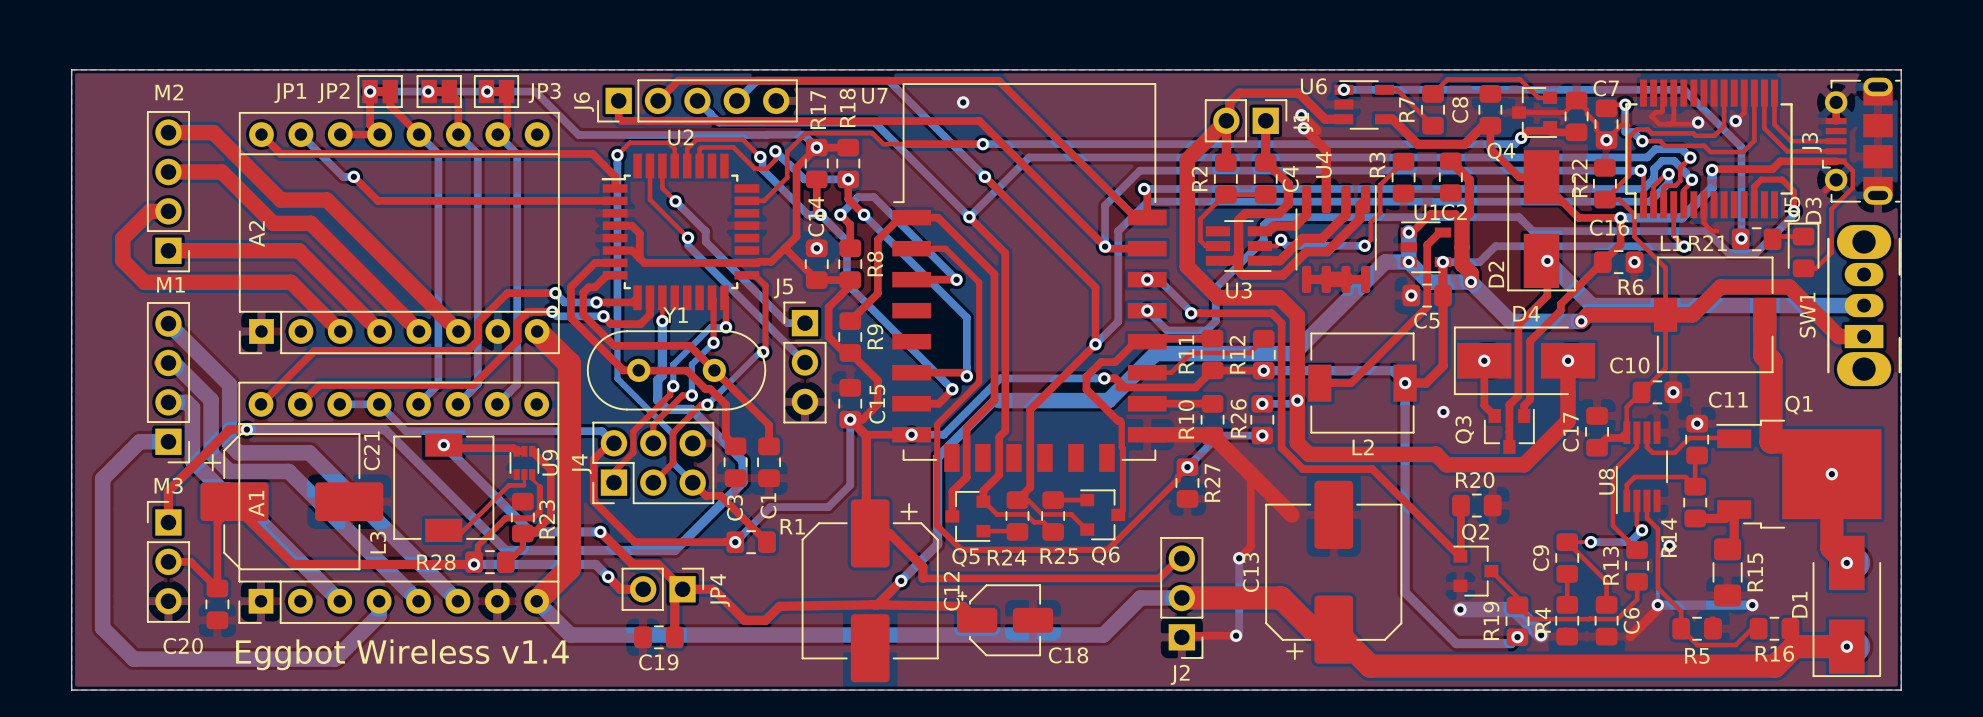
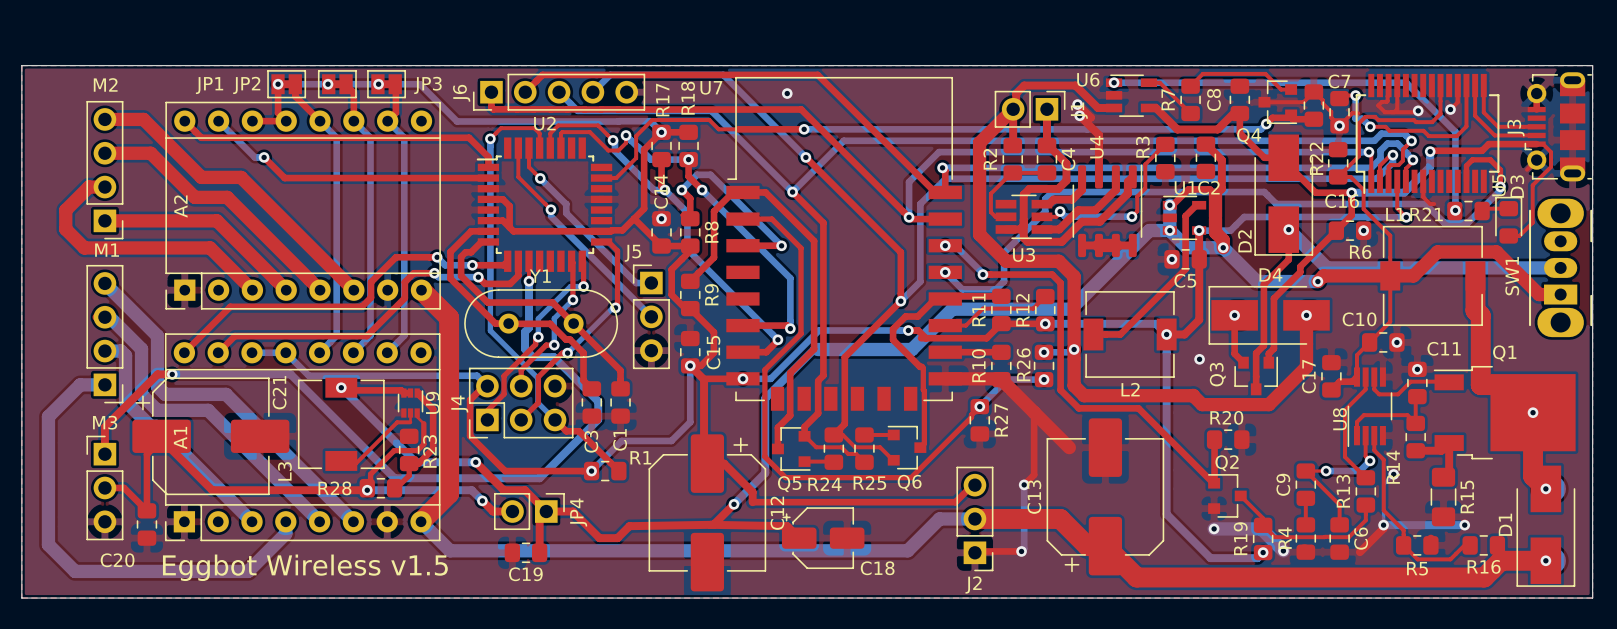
text: Eggbot Wireless v1.4 (402, 654) -> Eggbot Wireless v1.5 (305, 567)

